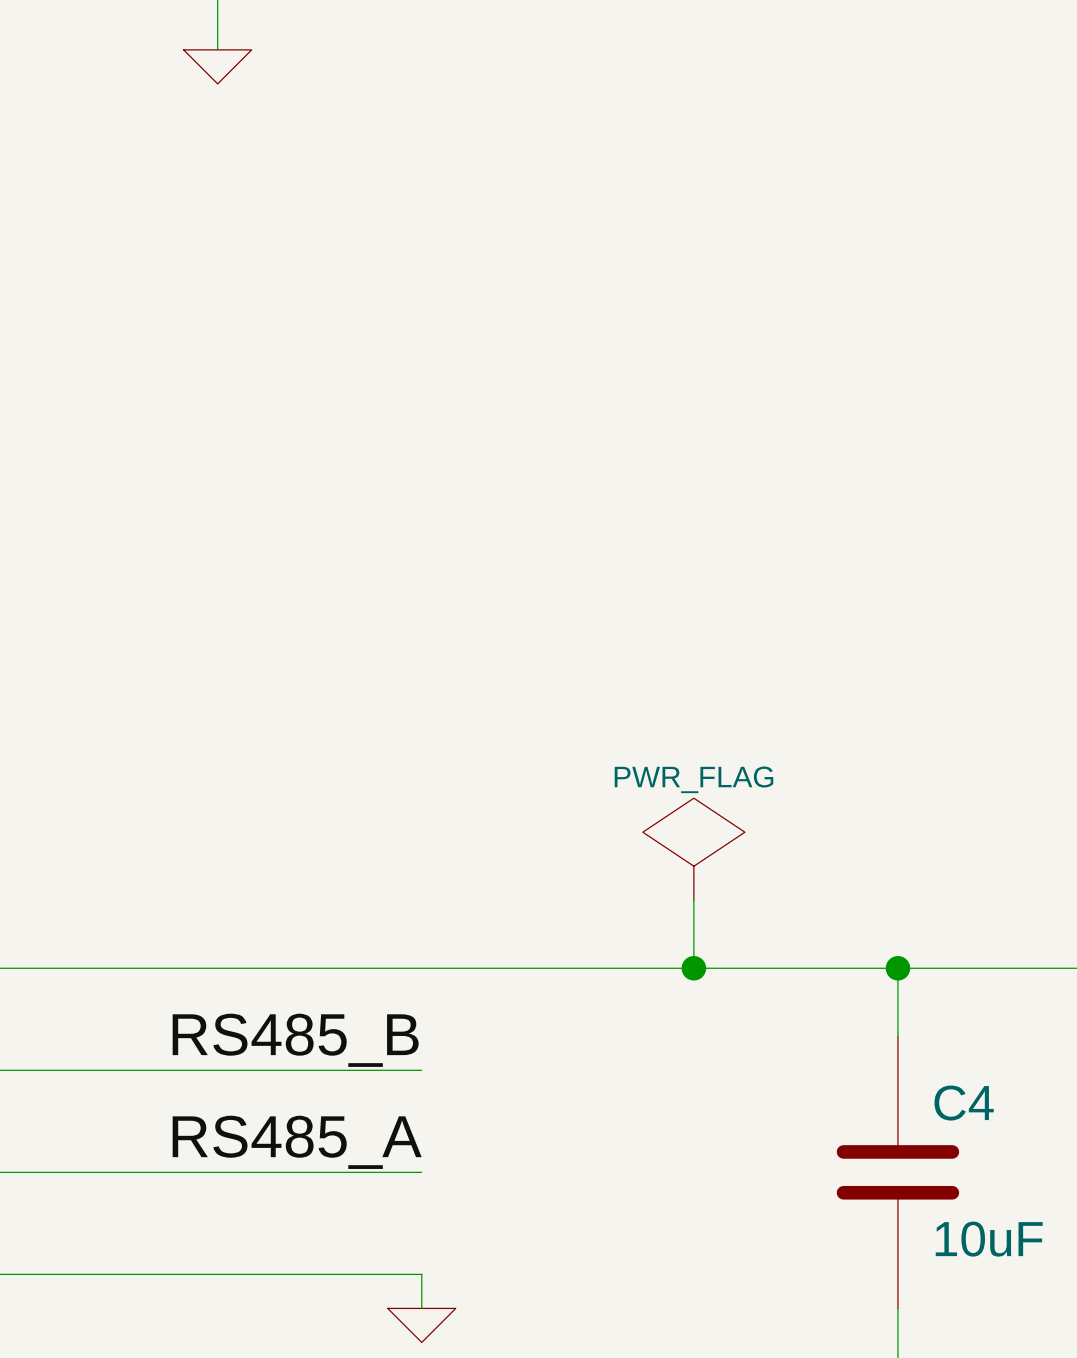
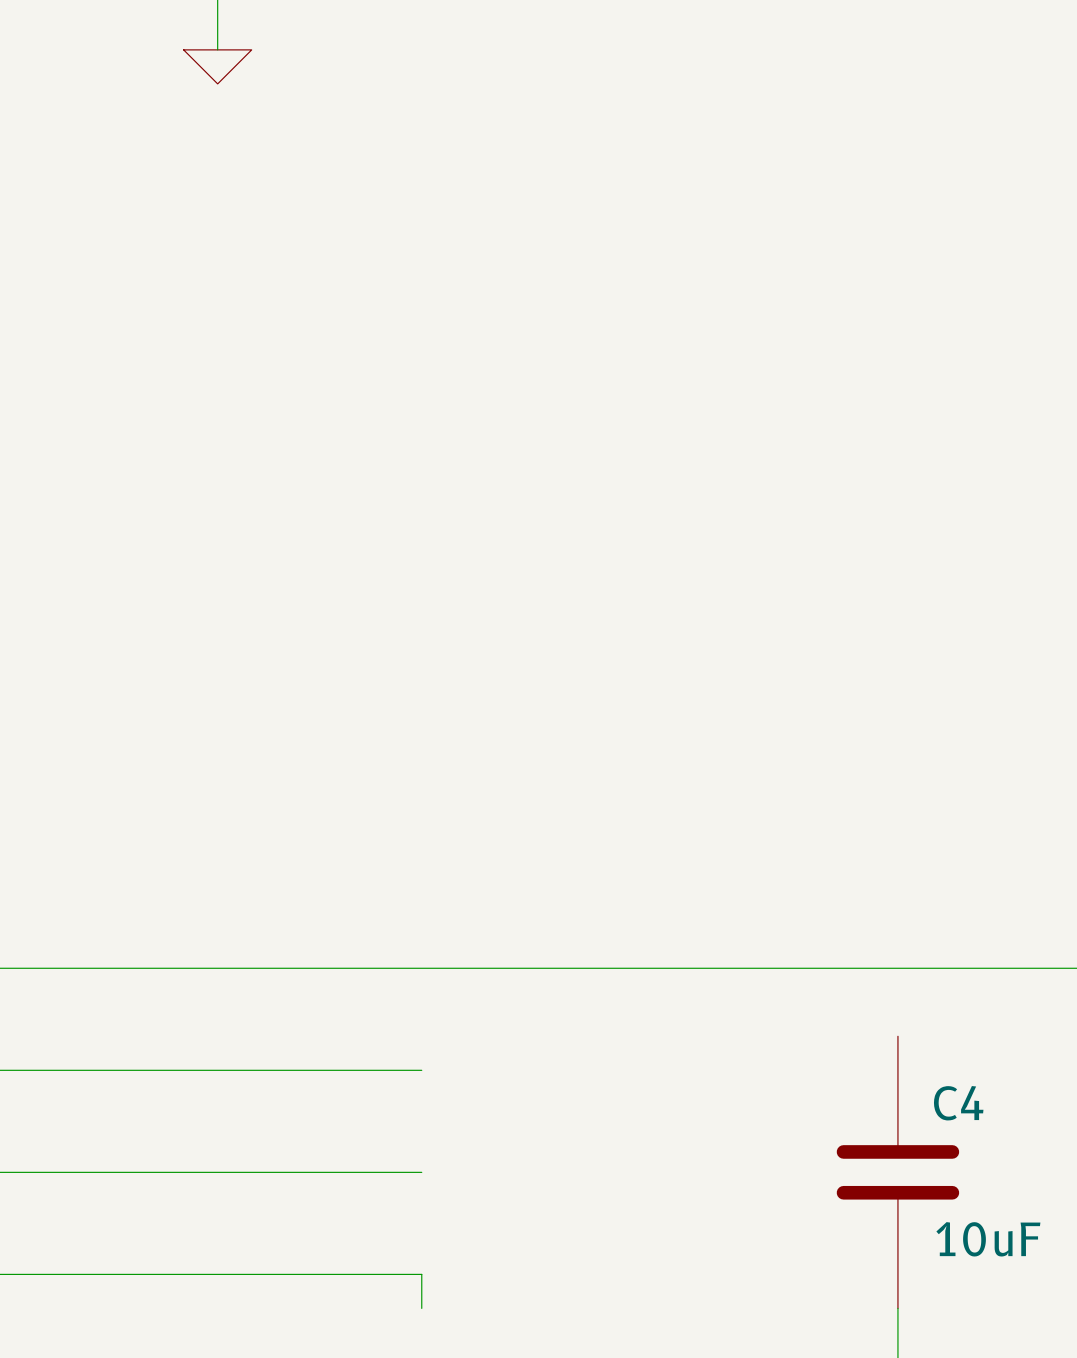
power symbol: PWR_FLAG (693, 849) -> none
wire: (693, 900) (693, 968) -> none
junction: (693, 968) -> none
wire: (897, 968) (897, 1036) -> none
junction: (897, 968) -> none
label: RS485_B (295, 1040) -> none
label: RS485_A (297, 1142) -> none
power symbol: (421, 1325) -> none

